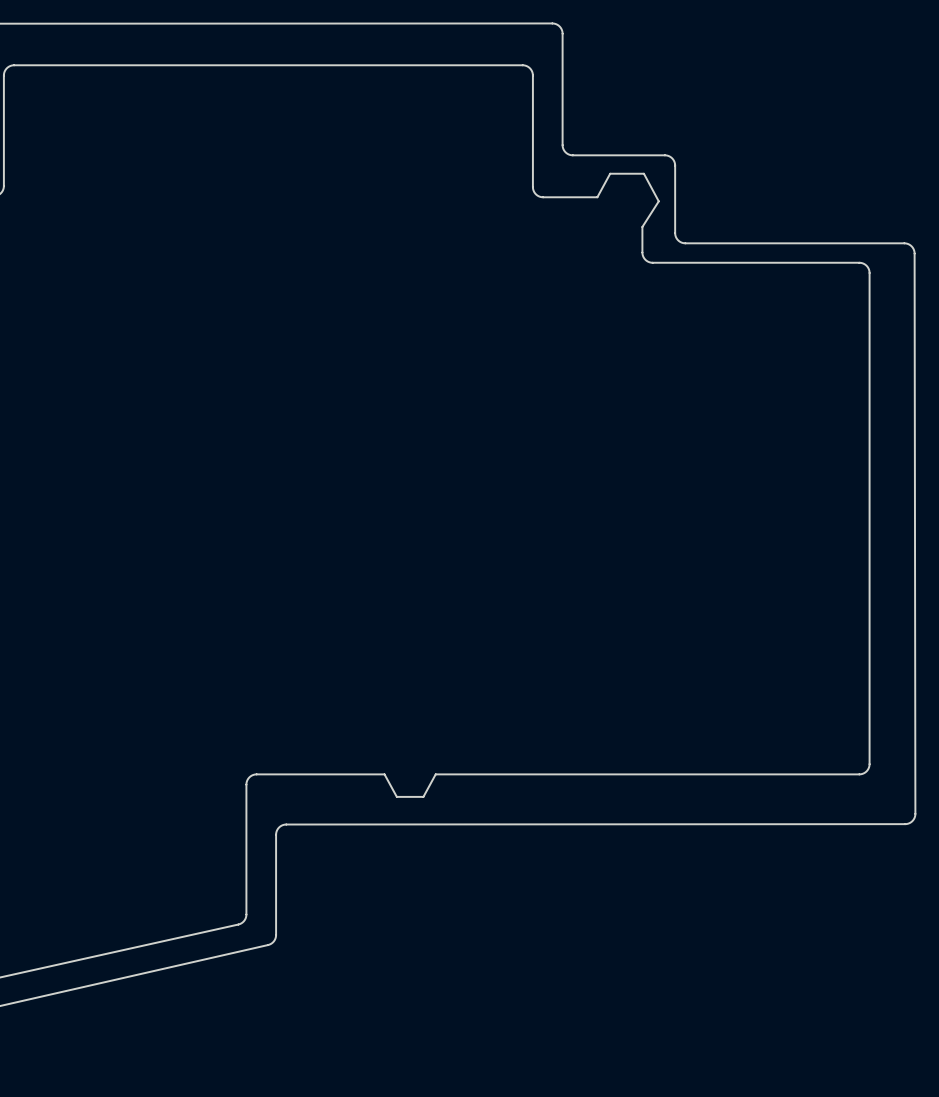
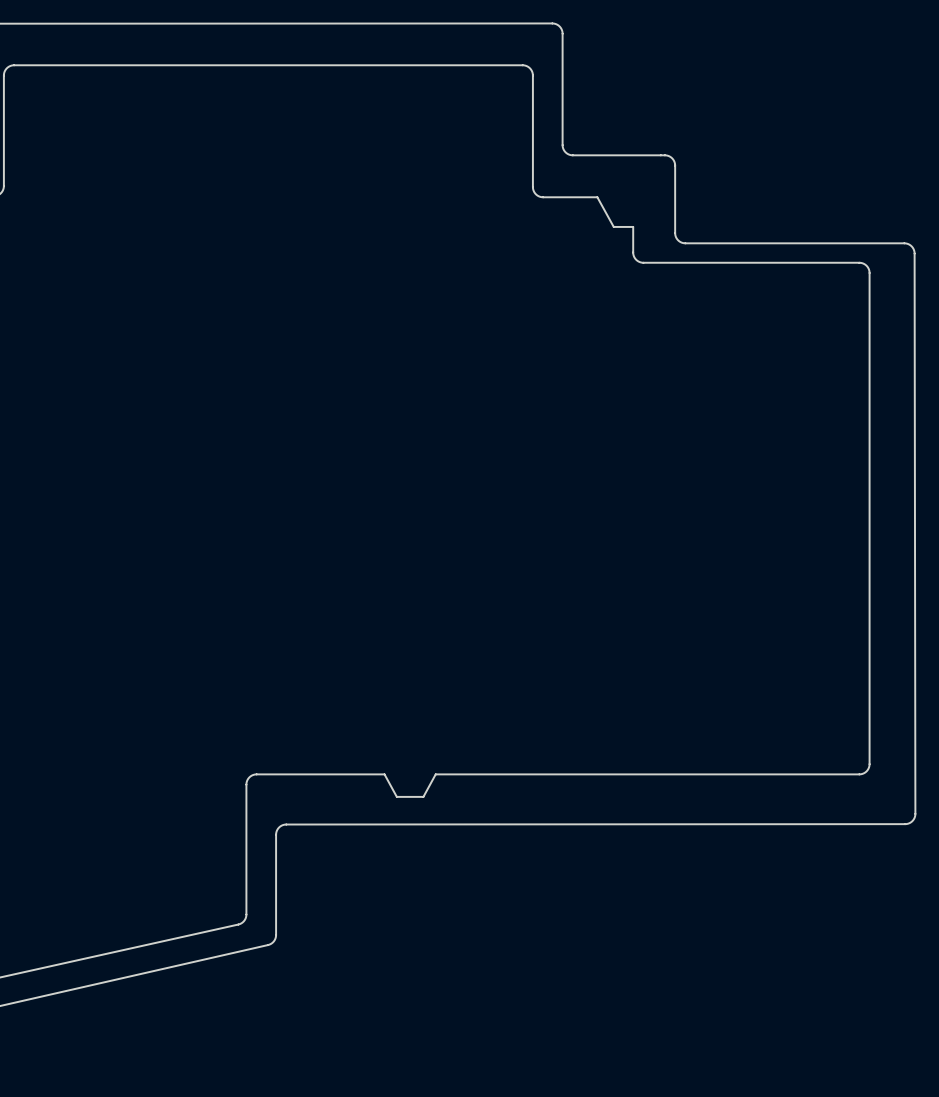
board edge: (597, 197) (610, 173) (643, 173) (658, 201) (642, 226) (642, 254) (646, 260) (652, 262) -> (597, 197) (613, 226) (633, 226) (633, 253) (635, 258) (641, 262) (652, 262)

